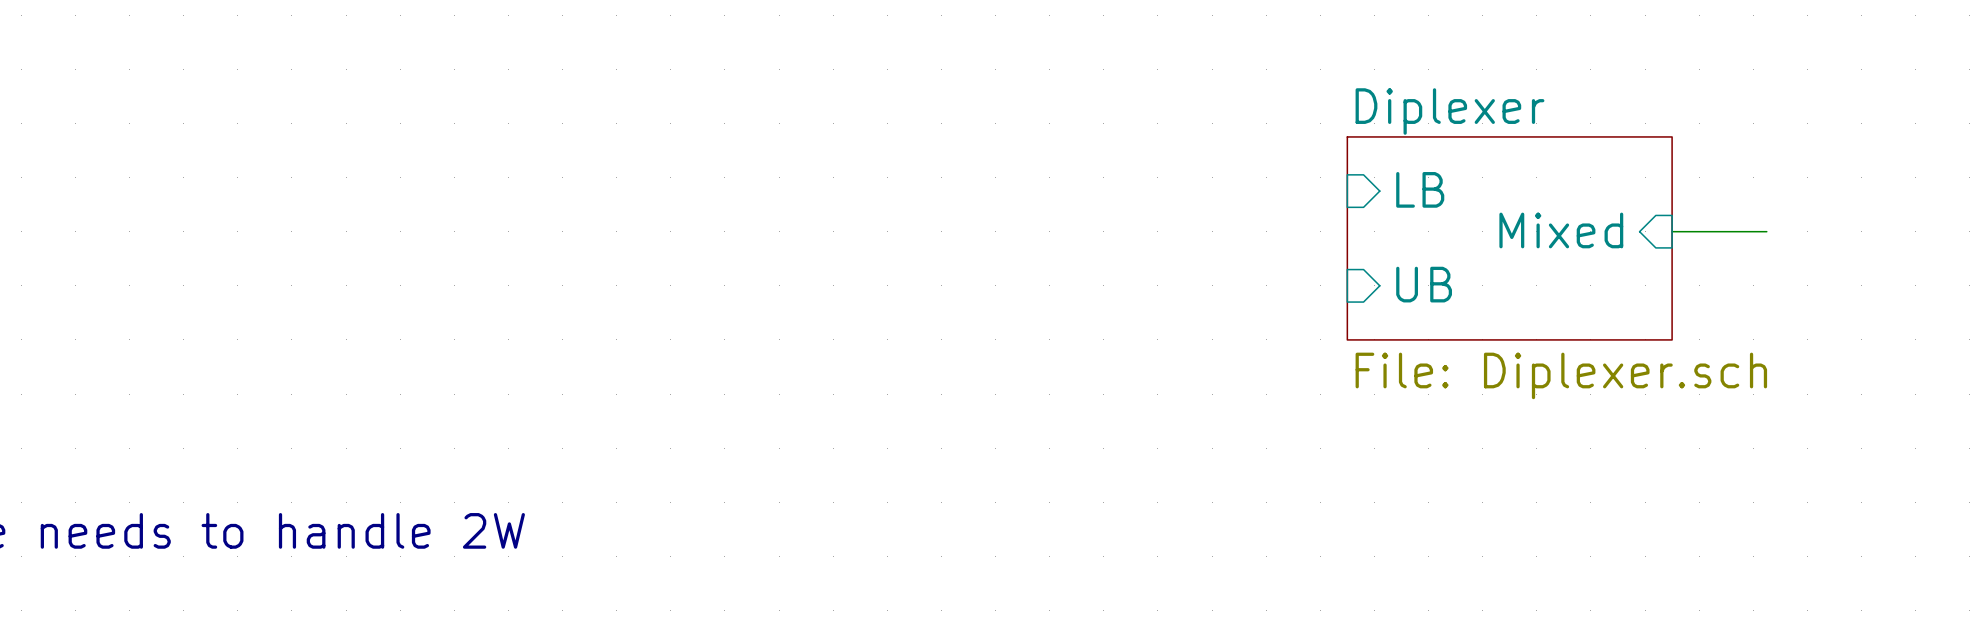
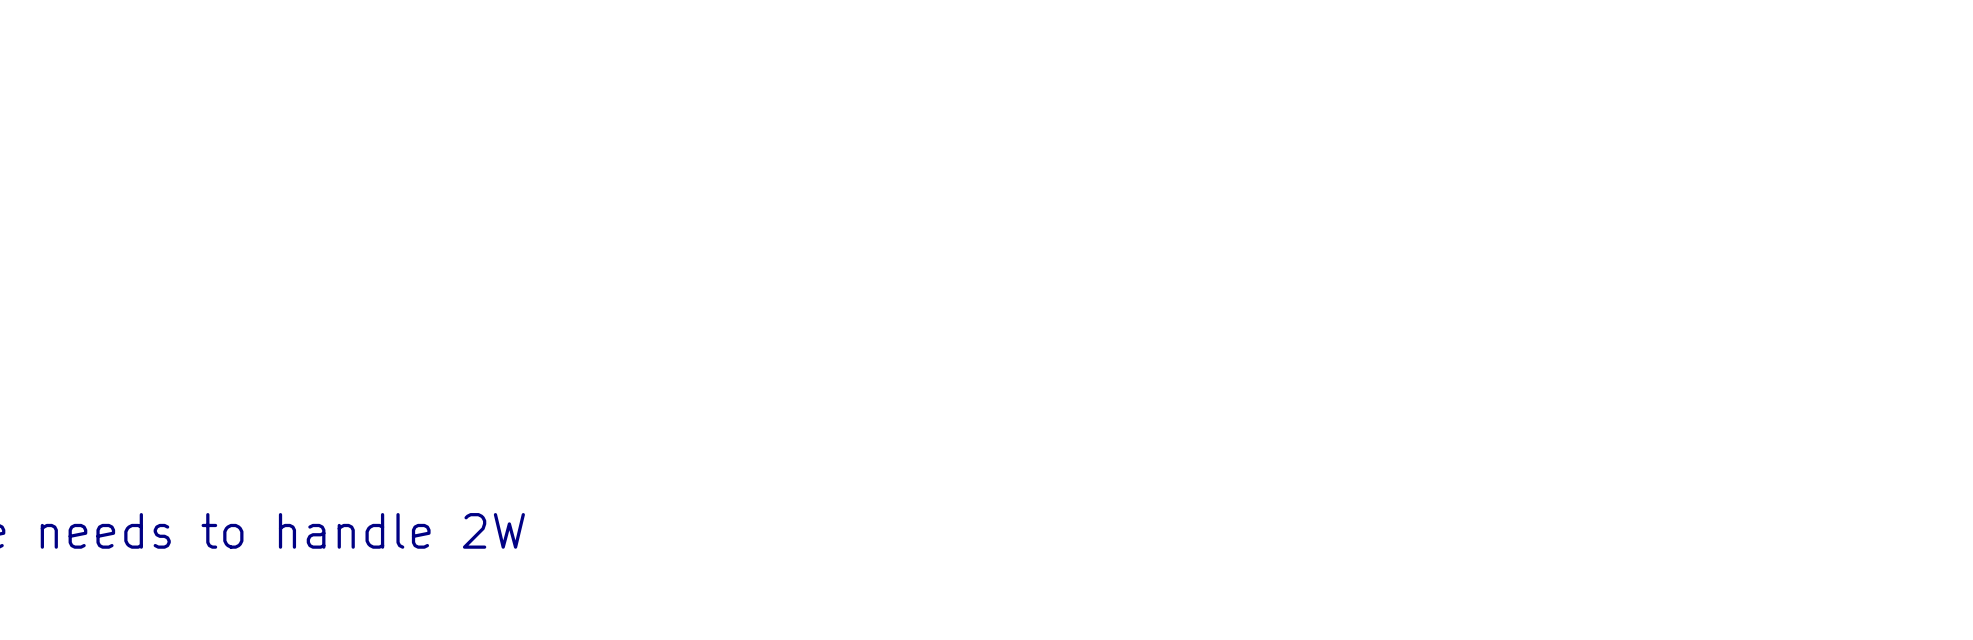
sheet pin: LB (1420, 189) -> none
sheet pin: Mixed (1561, 230) -> none
wire: (1672, 231) (1766, 231) -> none
sheet Diplexer: File: Diplexer.sch (1509, 238) -> none
sheet pin: UB (1424, 284) -> none

